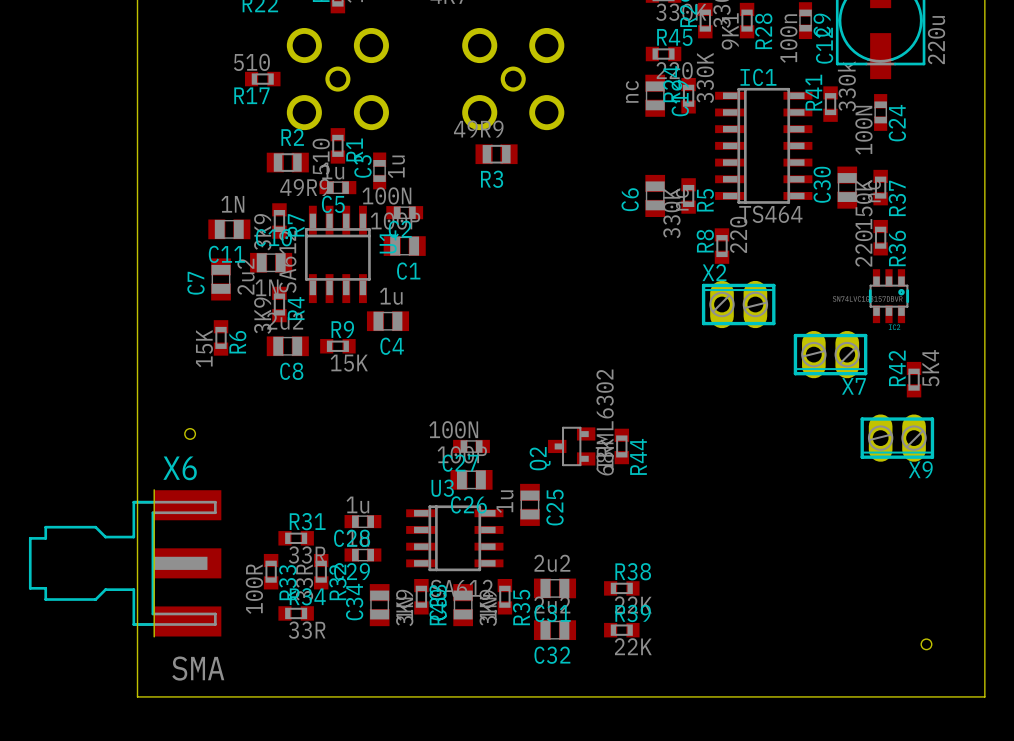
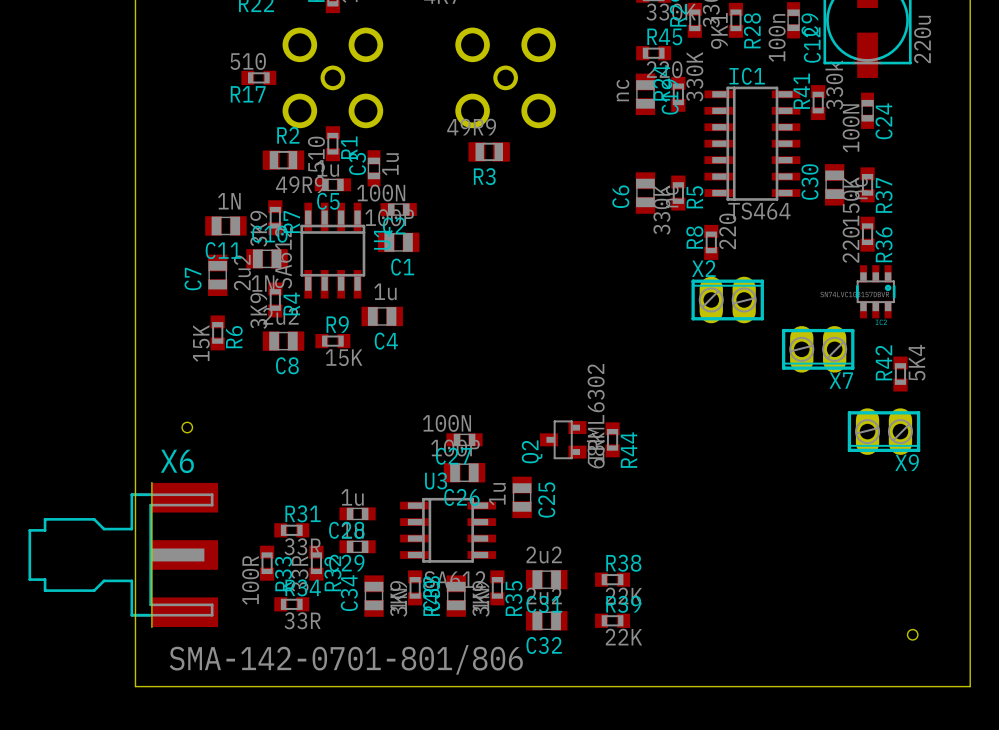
X6 value: SMA (198, 668) -> SMA-142-0701-801/806 (346, 659)

